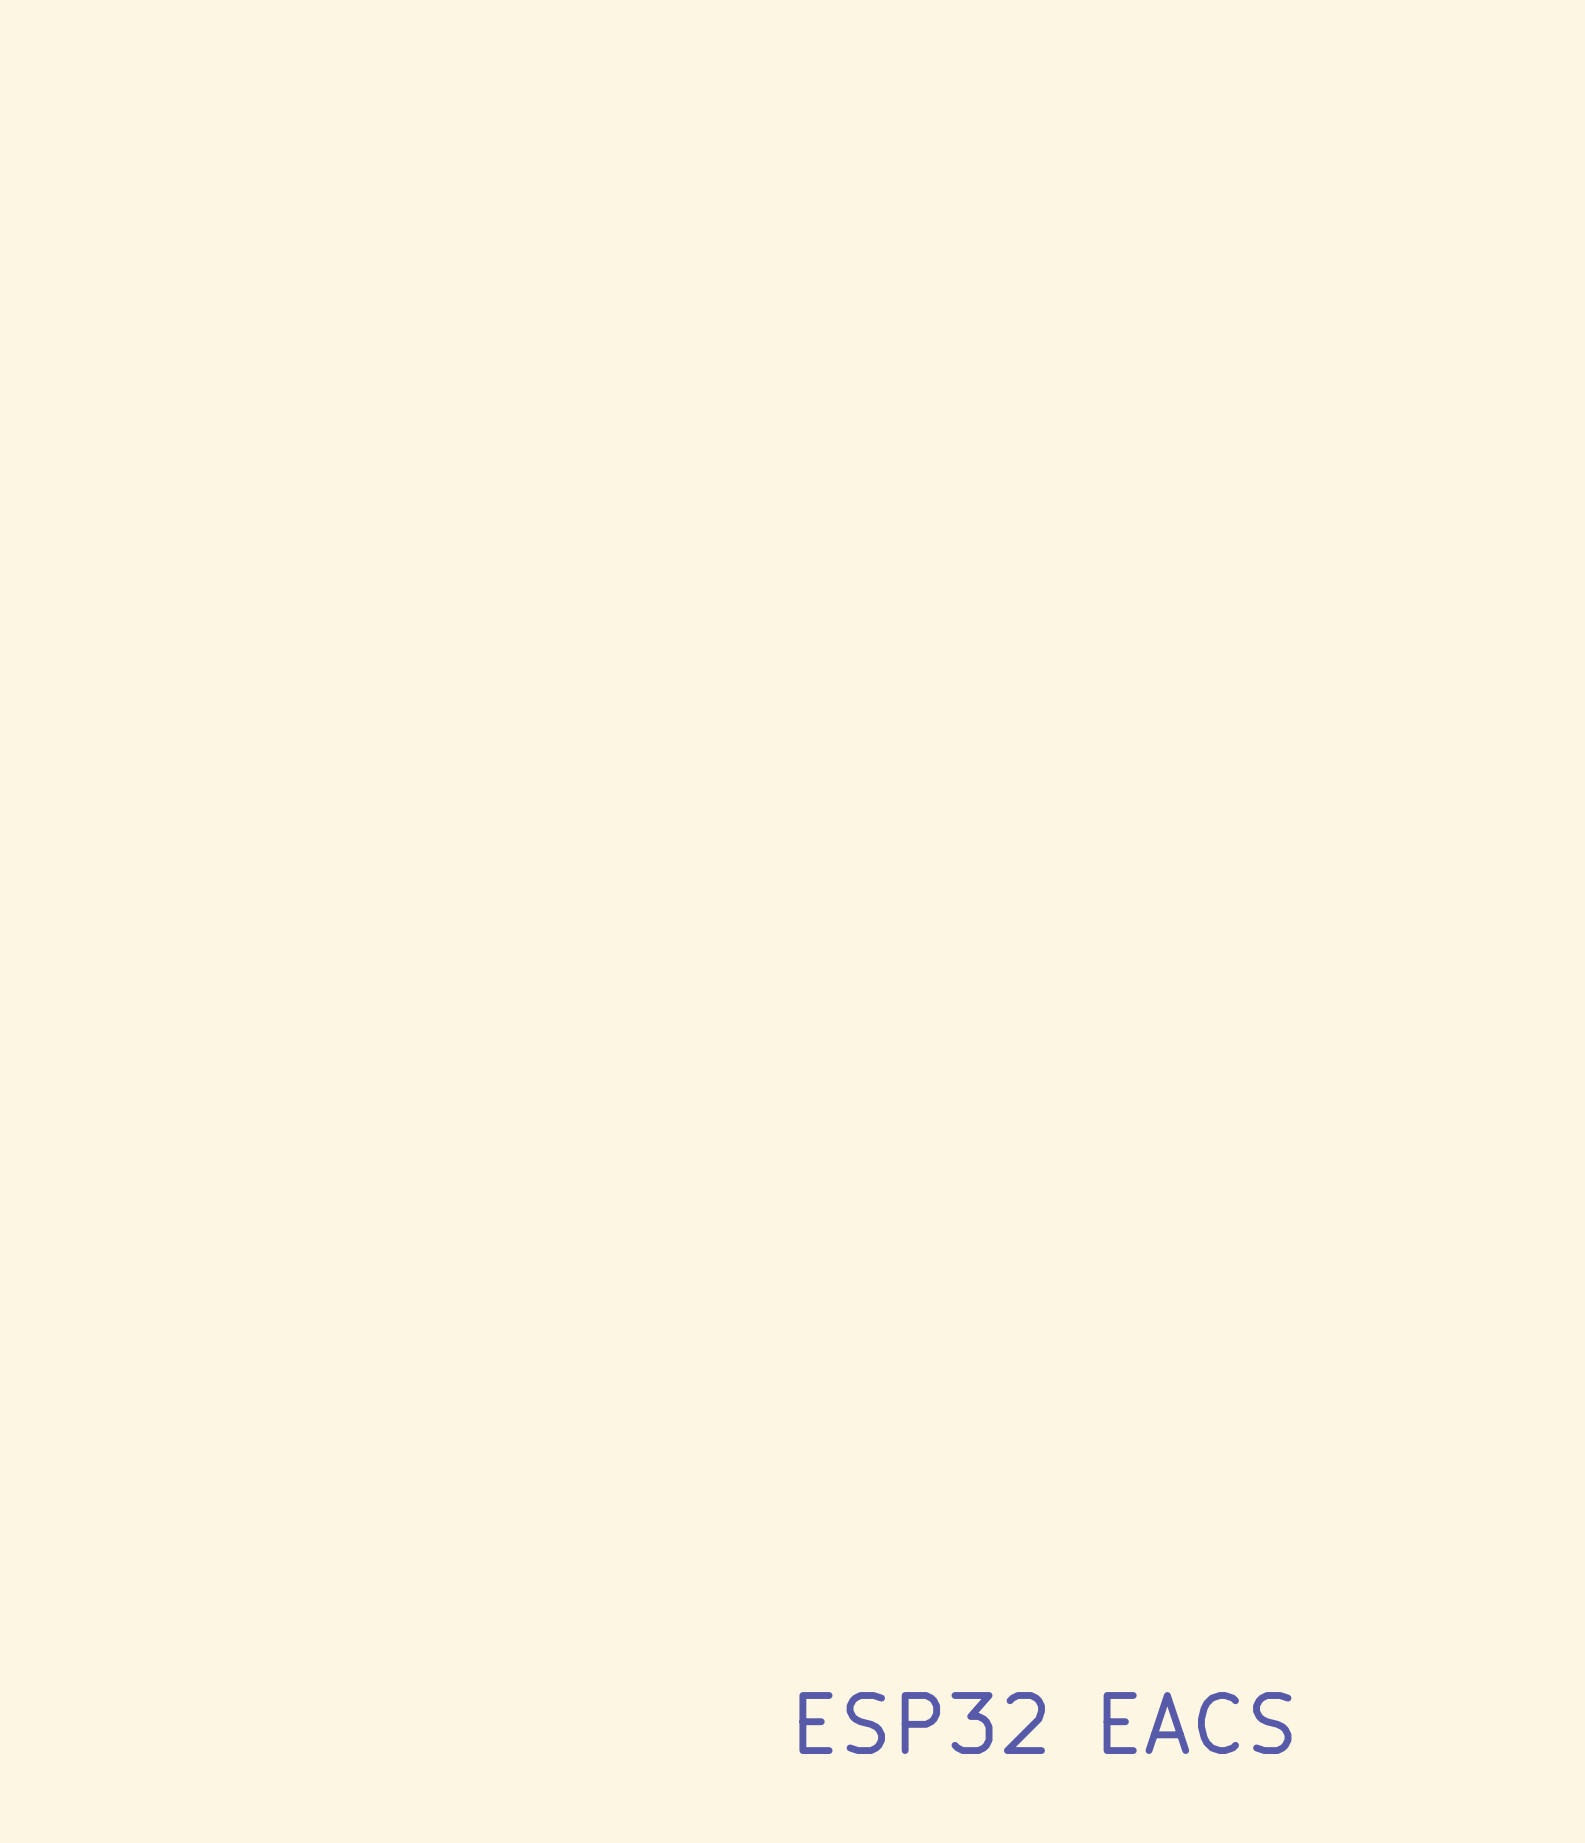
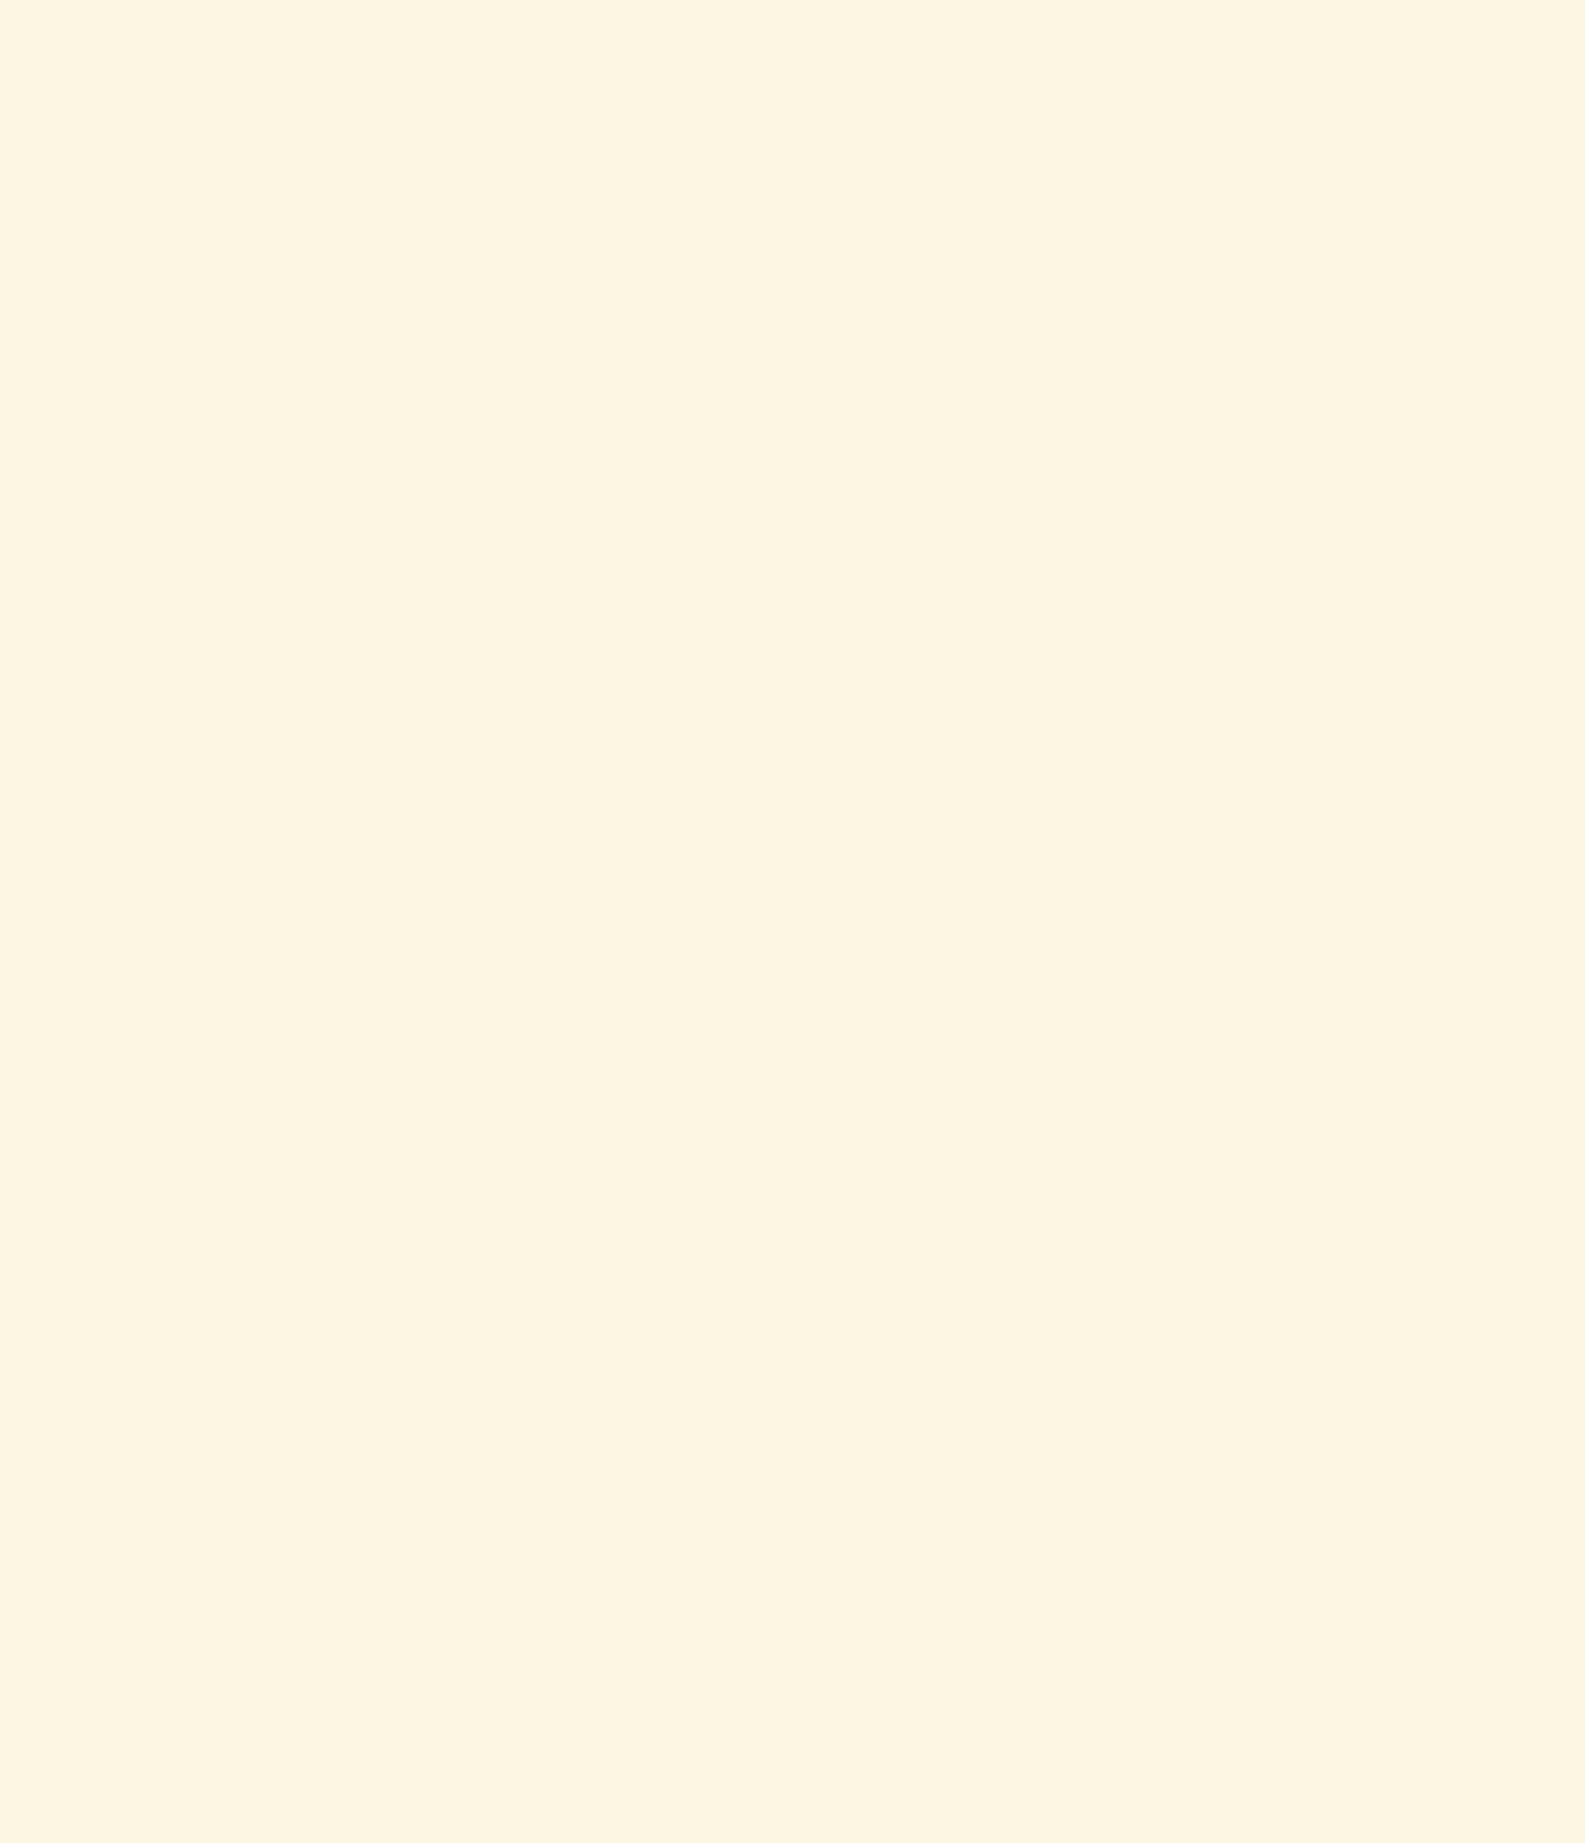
text: ESP32 EACS (1045, 1723) -> none

